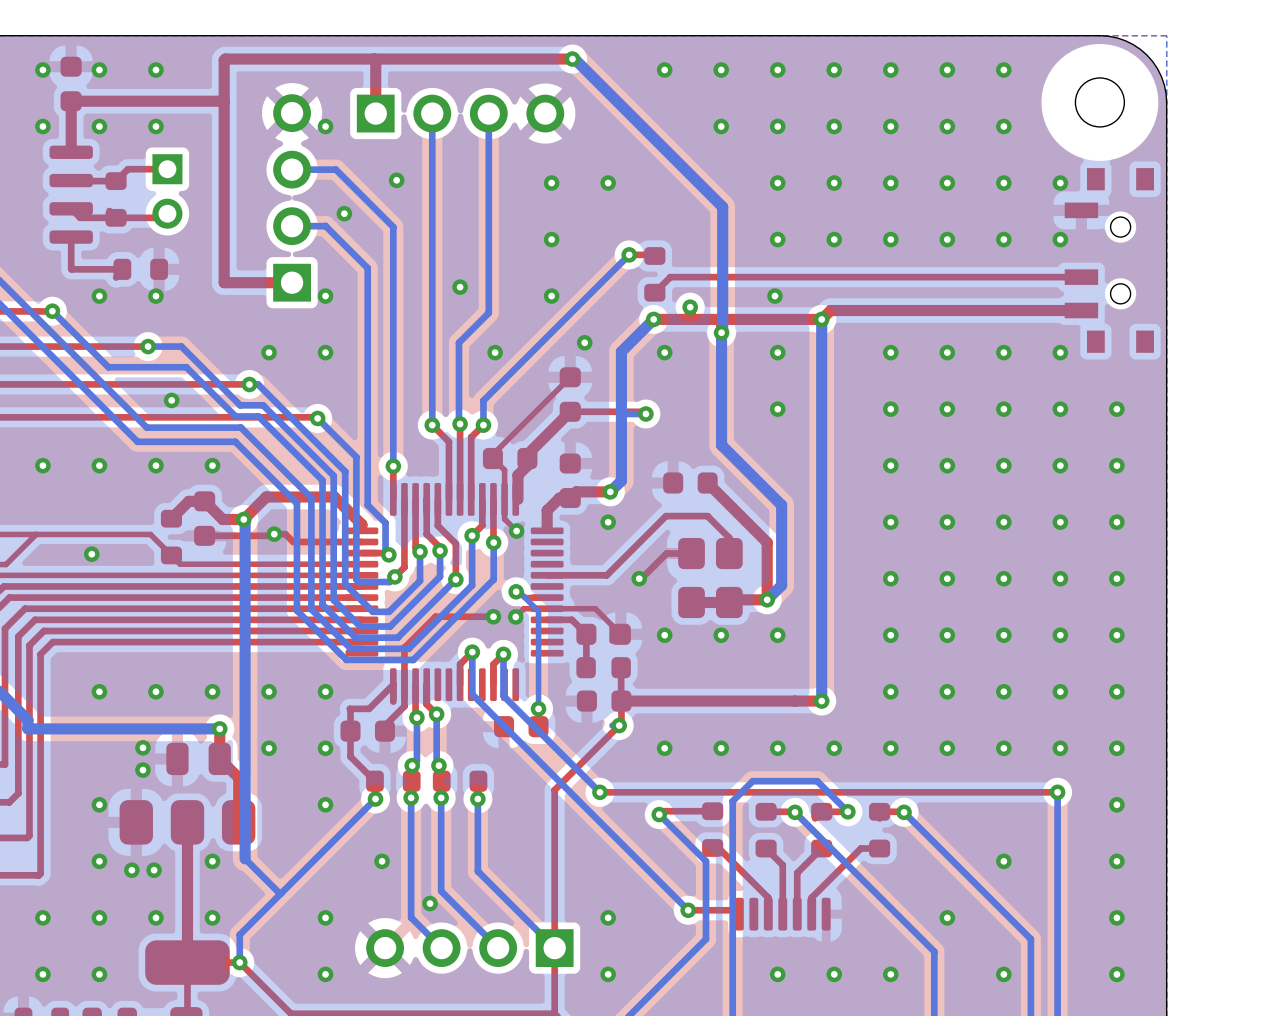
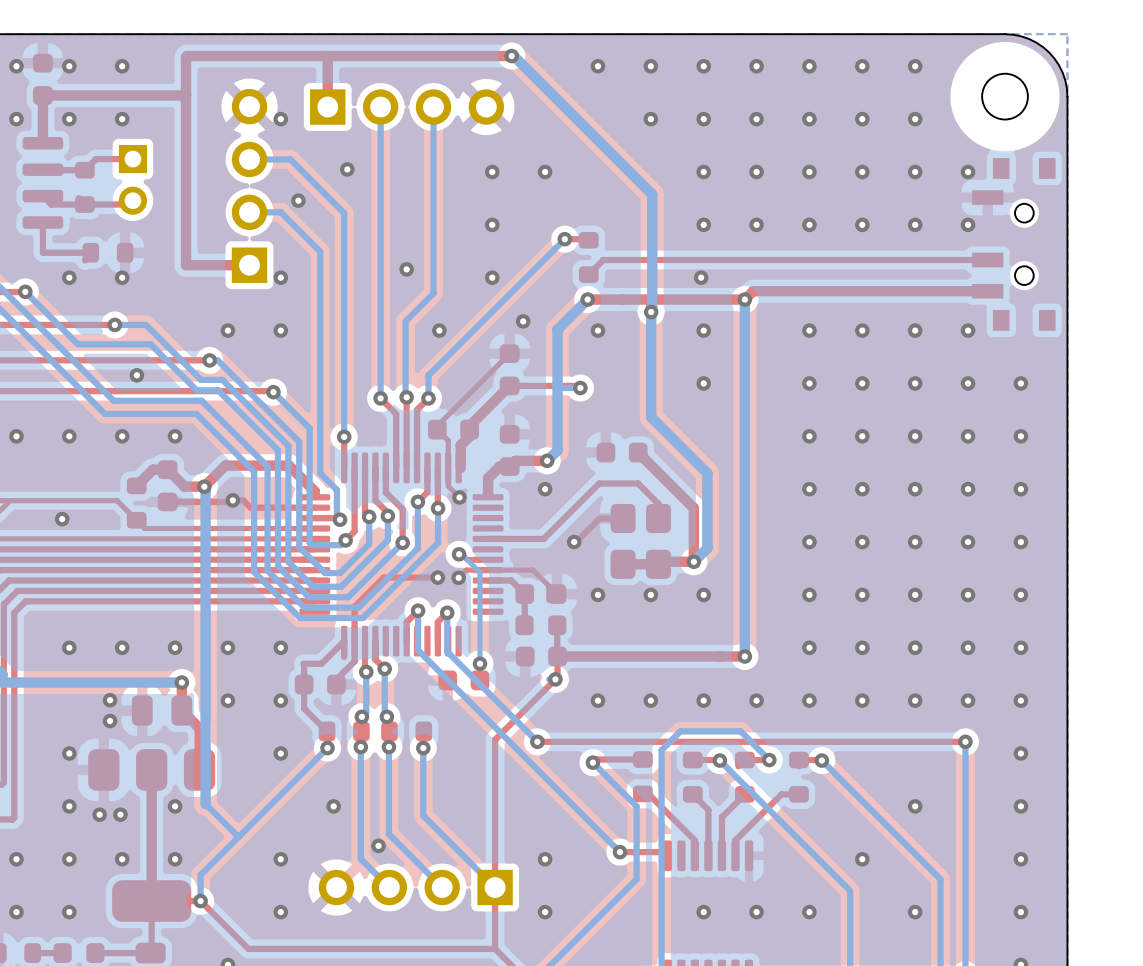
via: (690, 307) -> none

